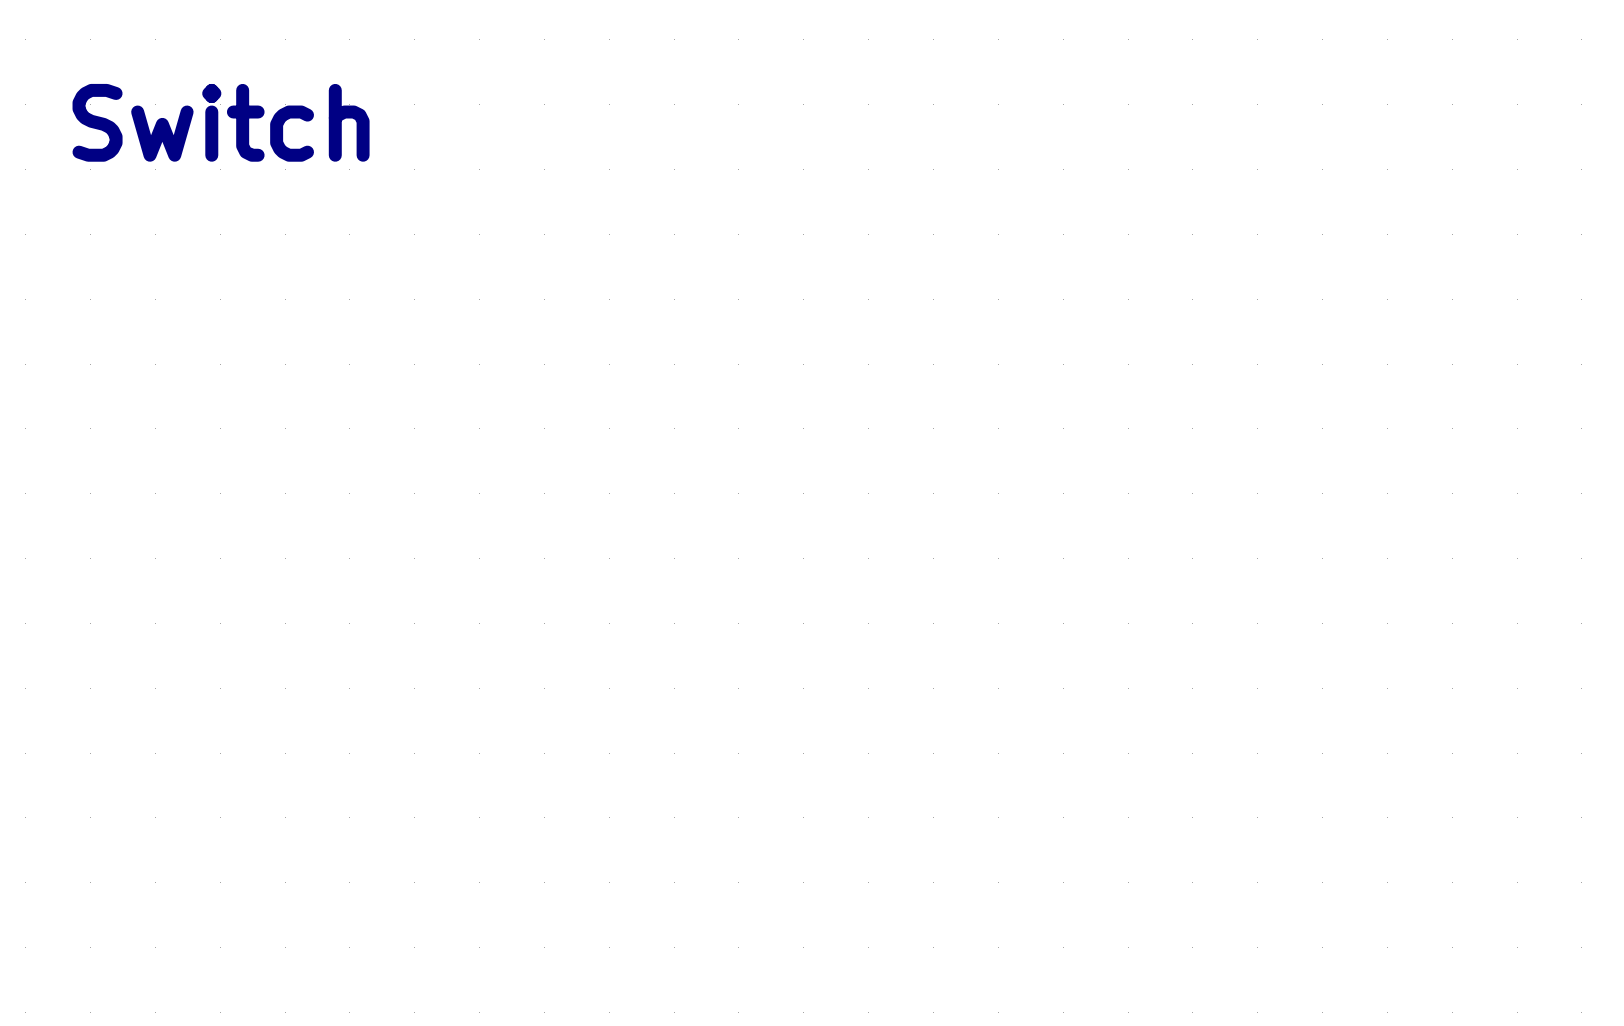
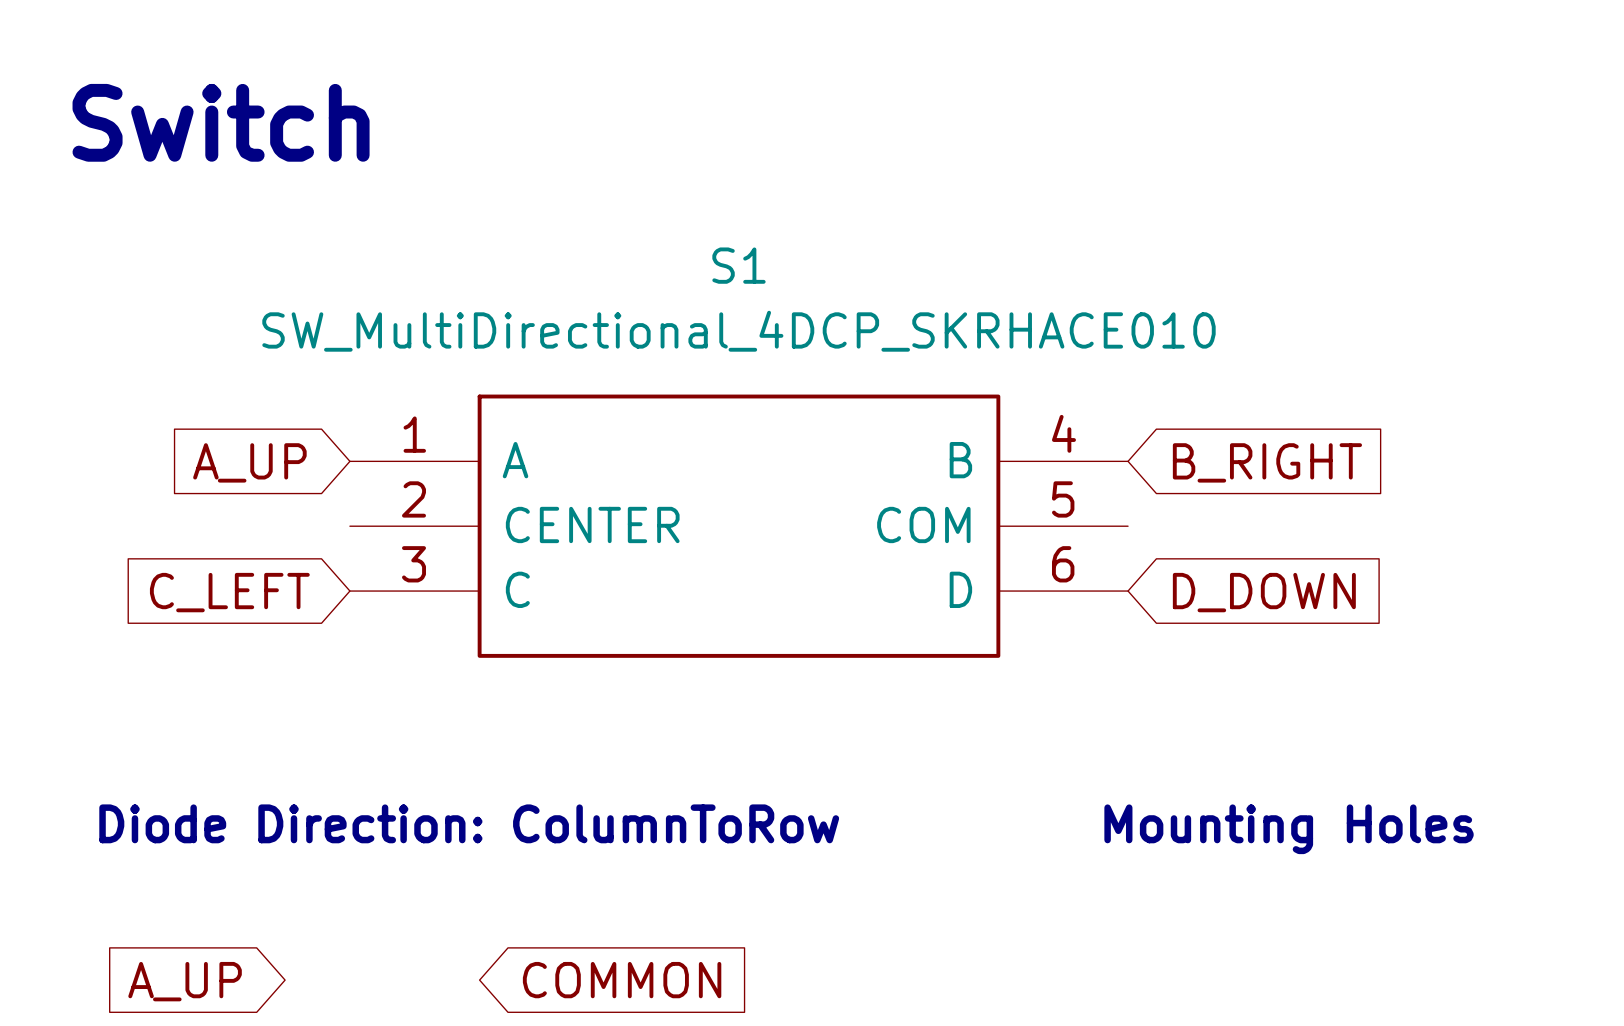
global label: none -> A_UP (249, 462)
global label: none -> B_RIGHT (1267, 462)
S1: none -> SW_MultiDirectional_4DCP_SKRHACE010 (738, 526)
global label: none -> C_LEFT (229, 592)
global label: none -> D_DOWN (1264, 592)
text: none -> Diode Direction: ColumnToRow (469, 823)
text: none -> Mounting Holes (1289, 829)
global label: none -> COMMON (622, 980)
global label: none -> A_UP (185, 981)

